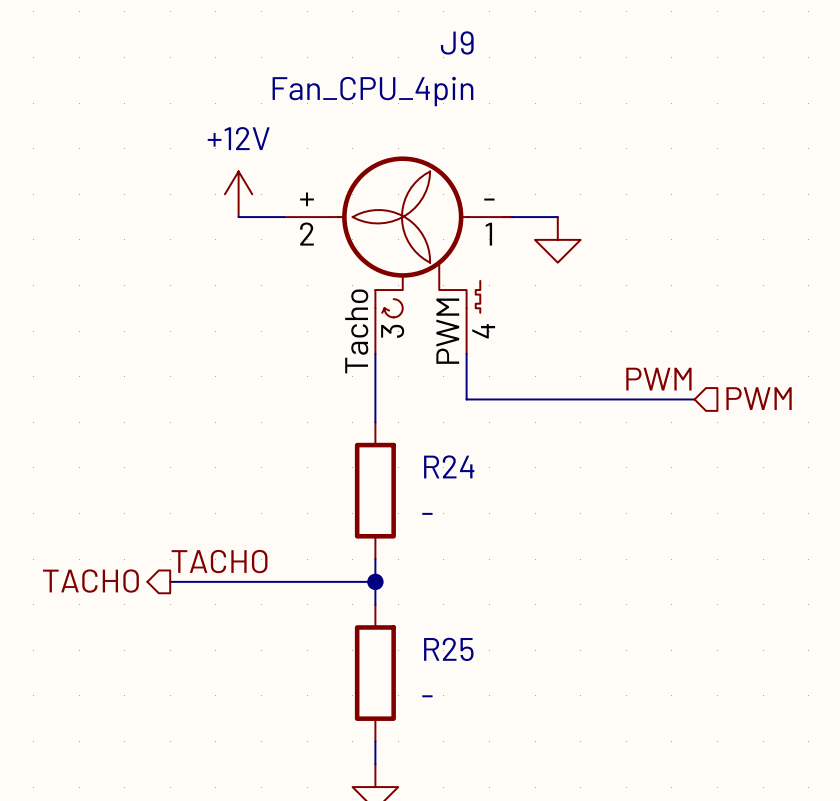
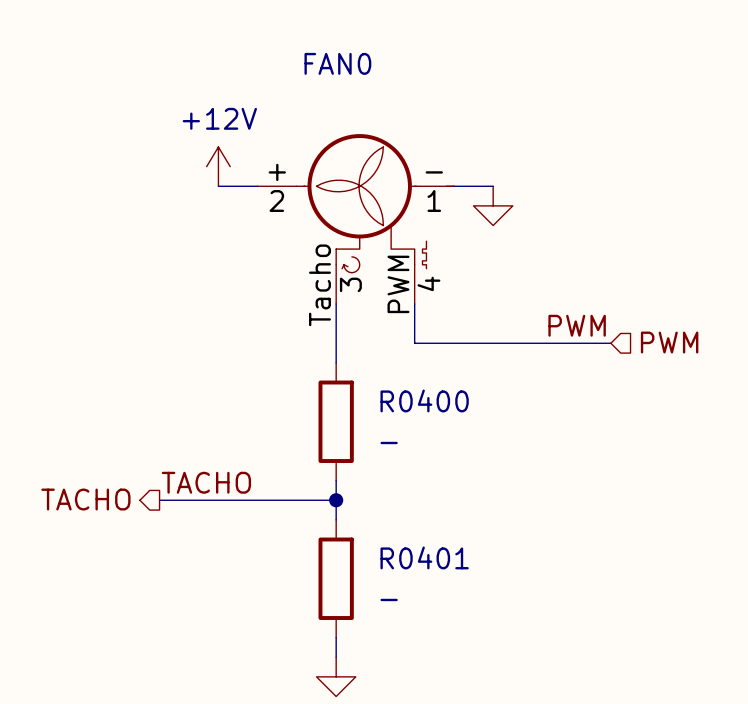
J9 name: J9 (457, 42) -> FAN0 (337, 63)
J9 value: Fan_CPU_4pin (372, 91) -> none
R24 name: R24 (449, 466) -> R0400 (424, 400)
R25 name: R25 (448, 649) -> R0401 (424, 557)

